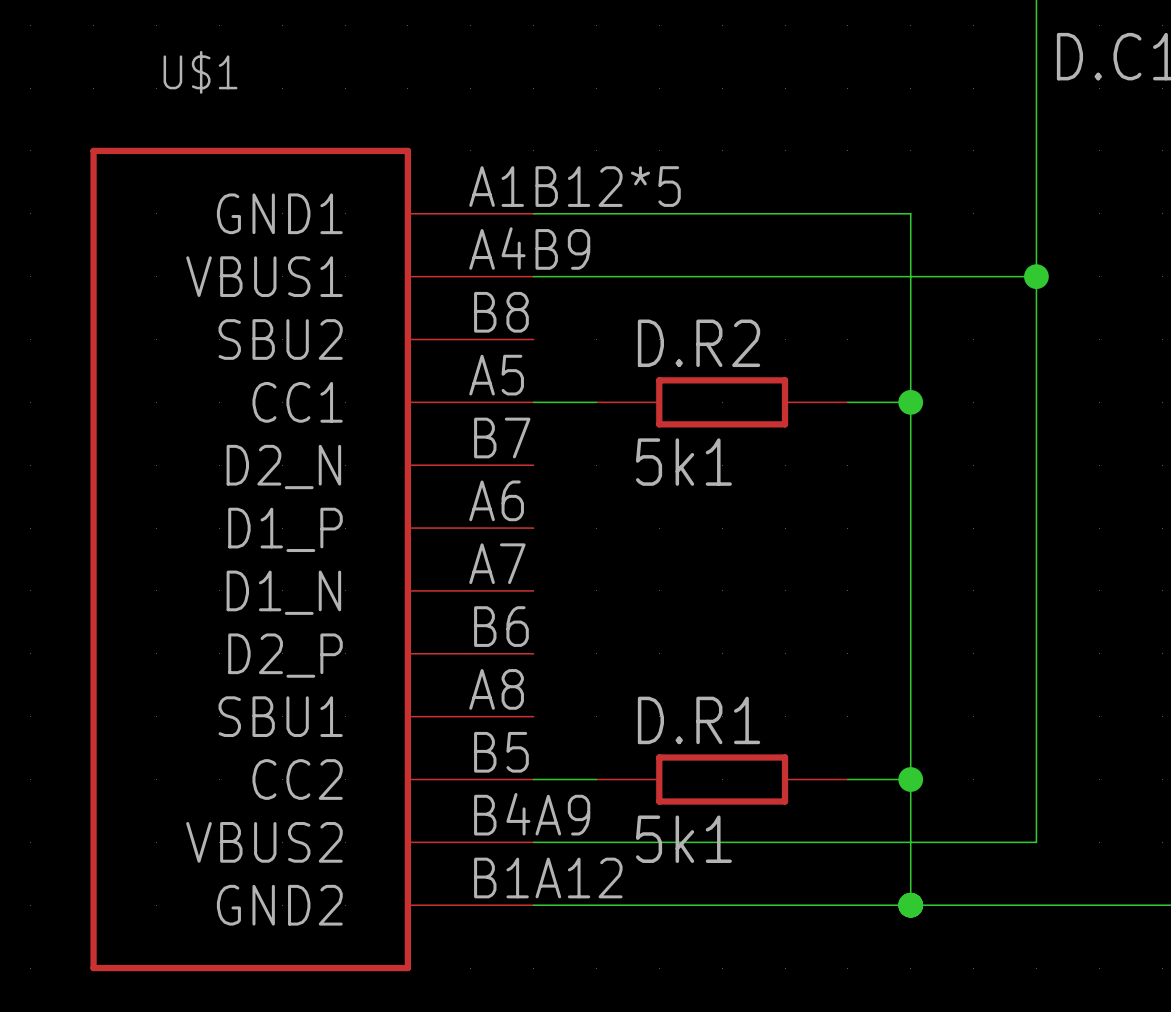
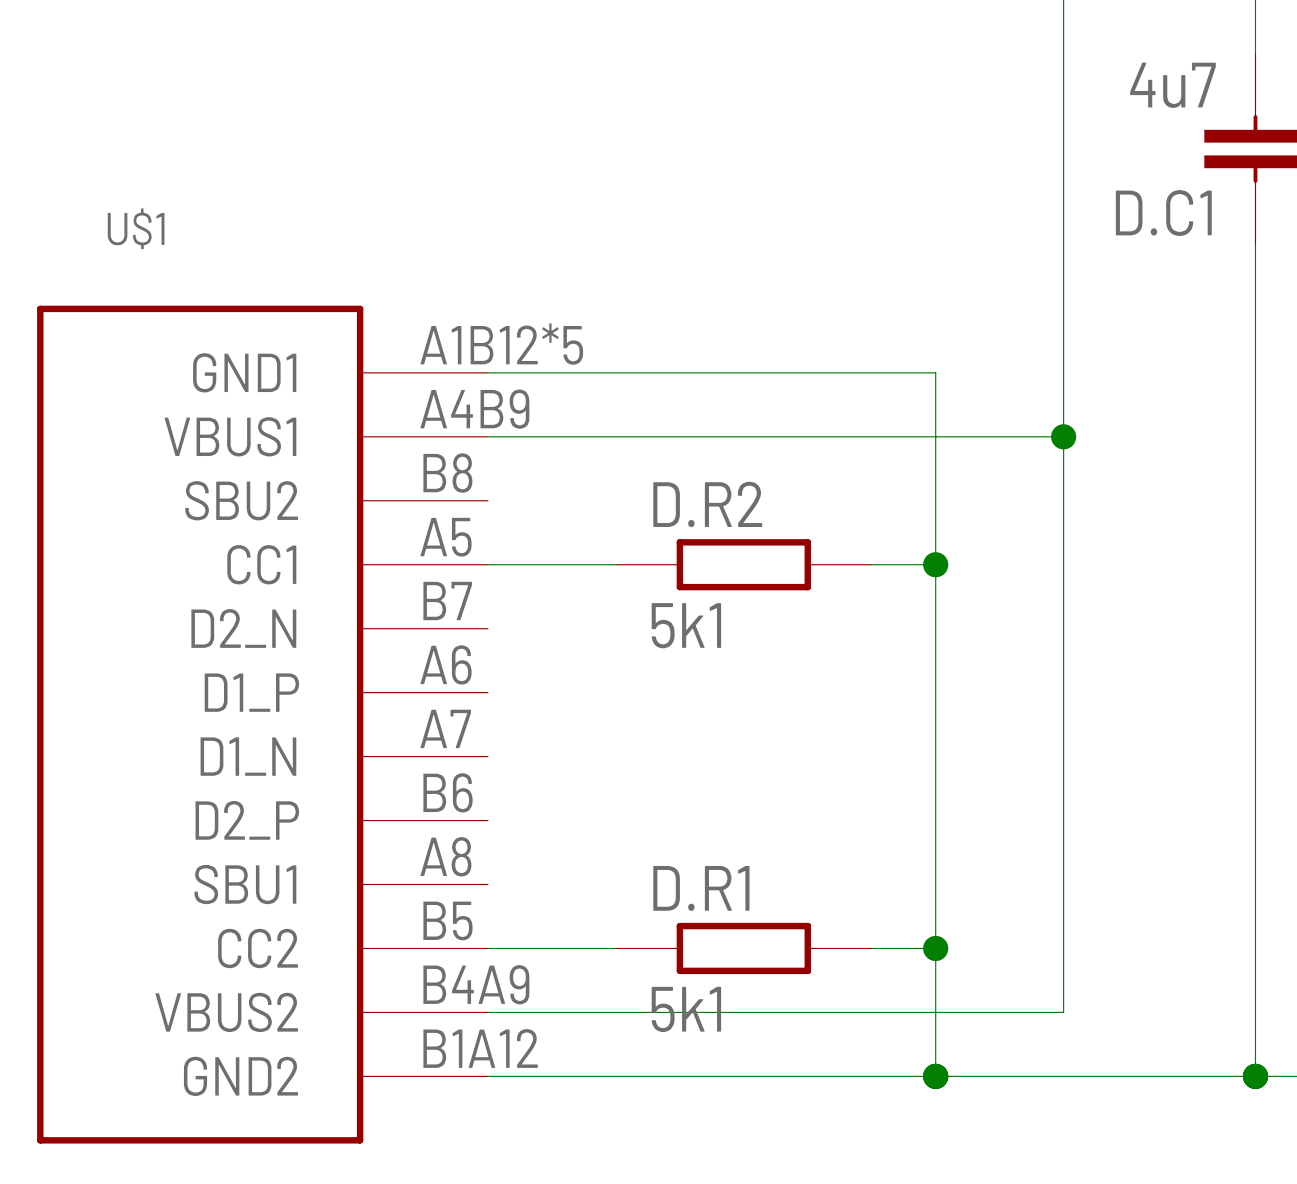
U$1 position: (312, 559) -> (262, 724)

